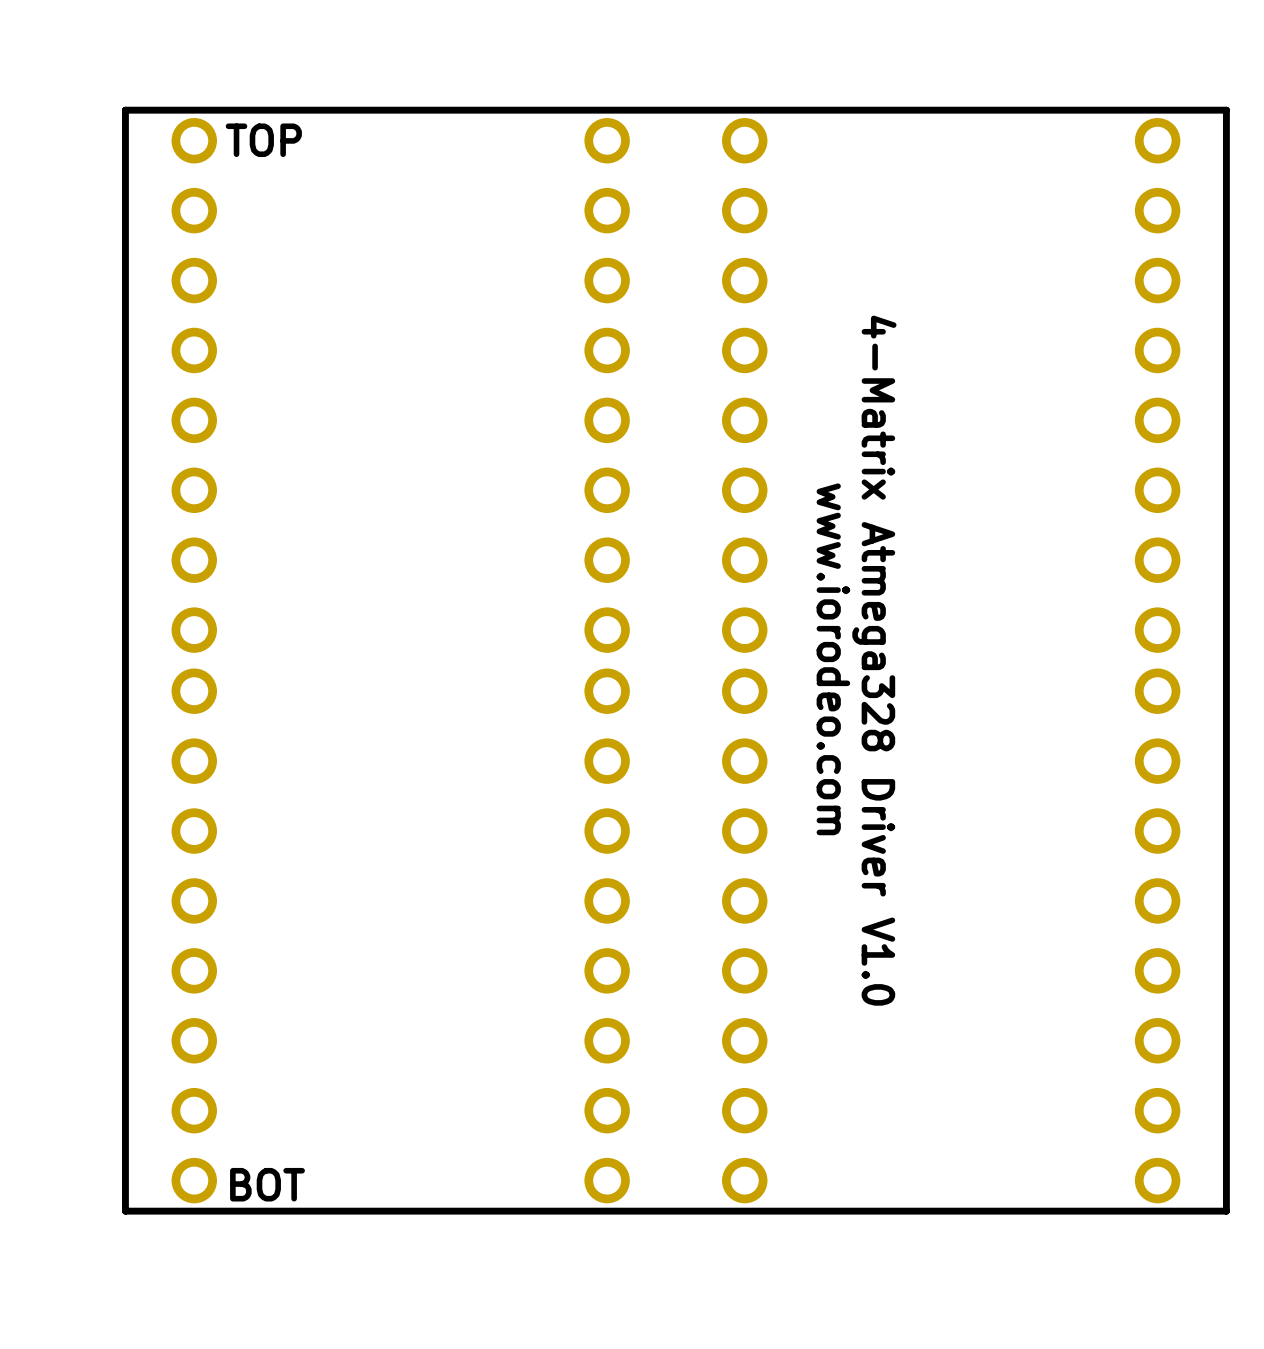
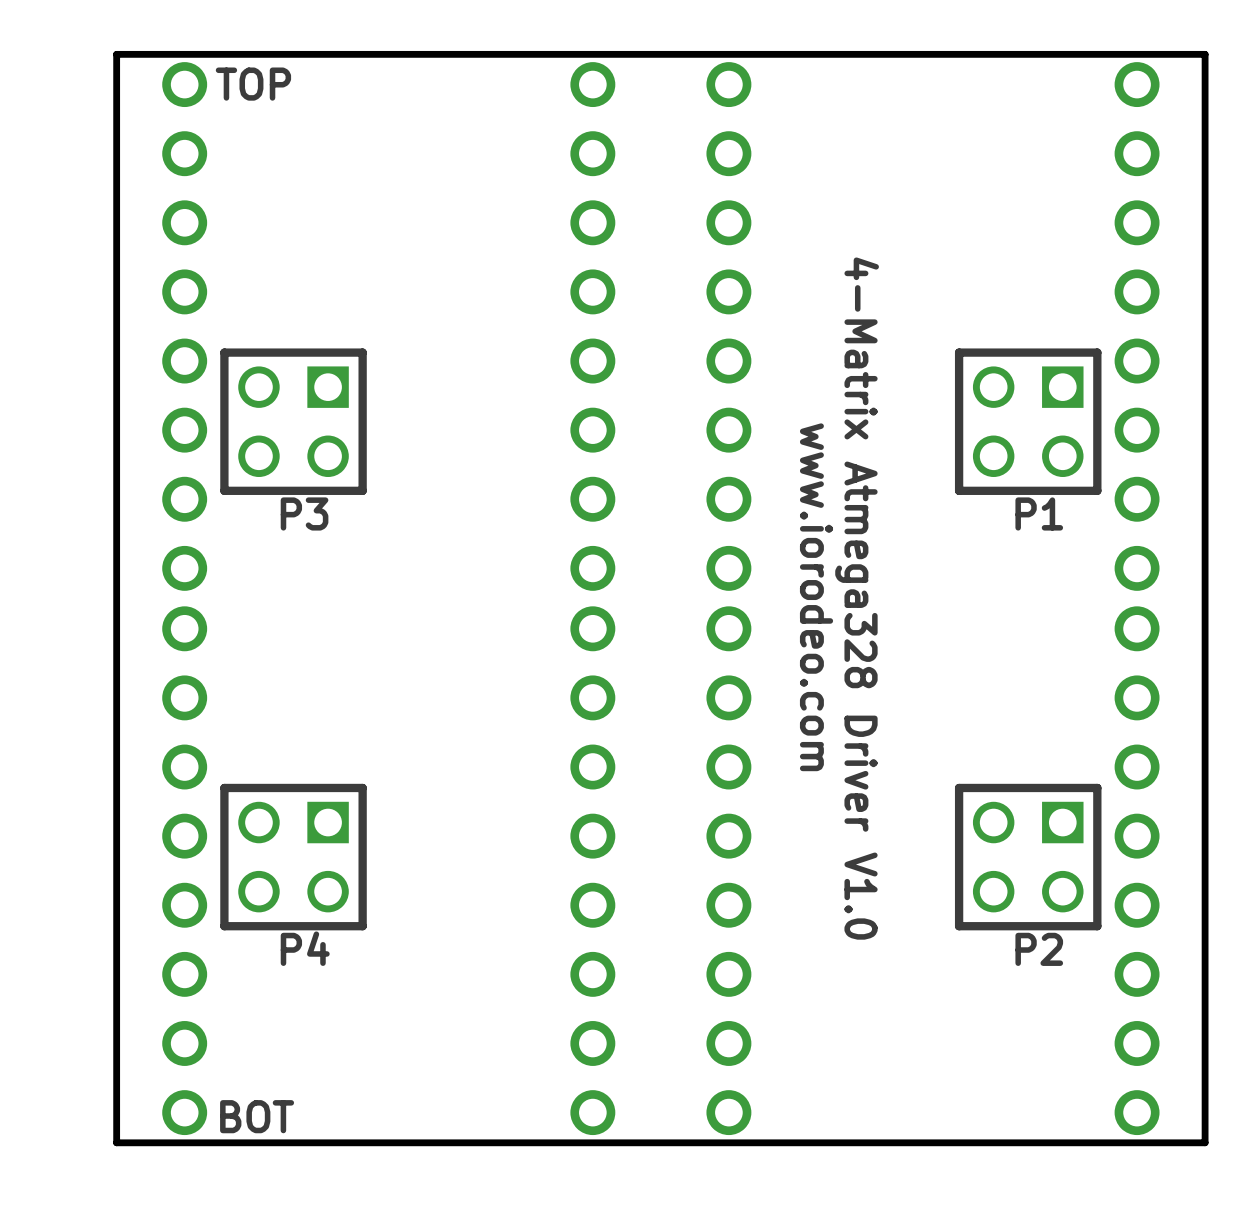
P3: none -> (293, 421)
P1: none -> (1028, 421)
P4: none -> (293, 857)
P2: none -> (1028, 857)

